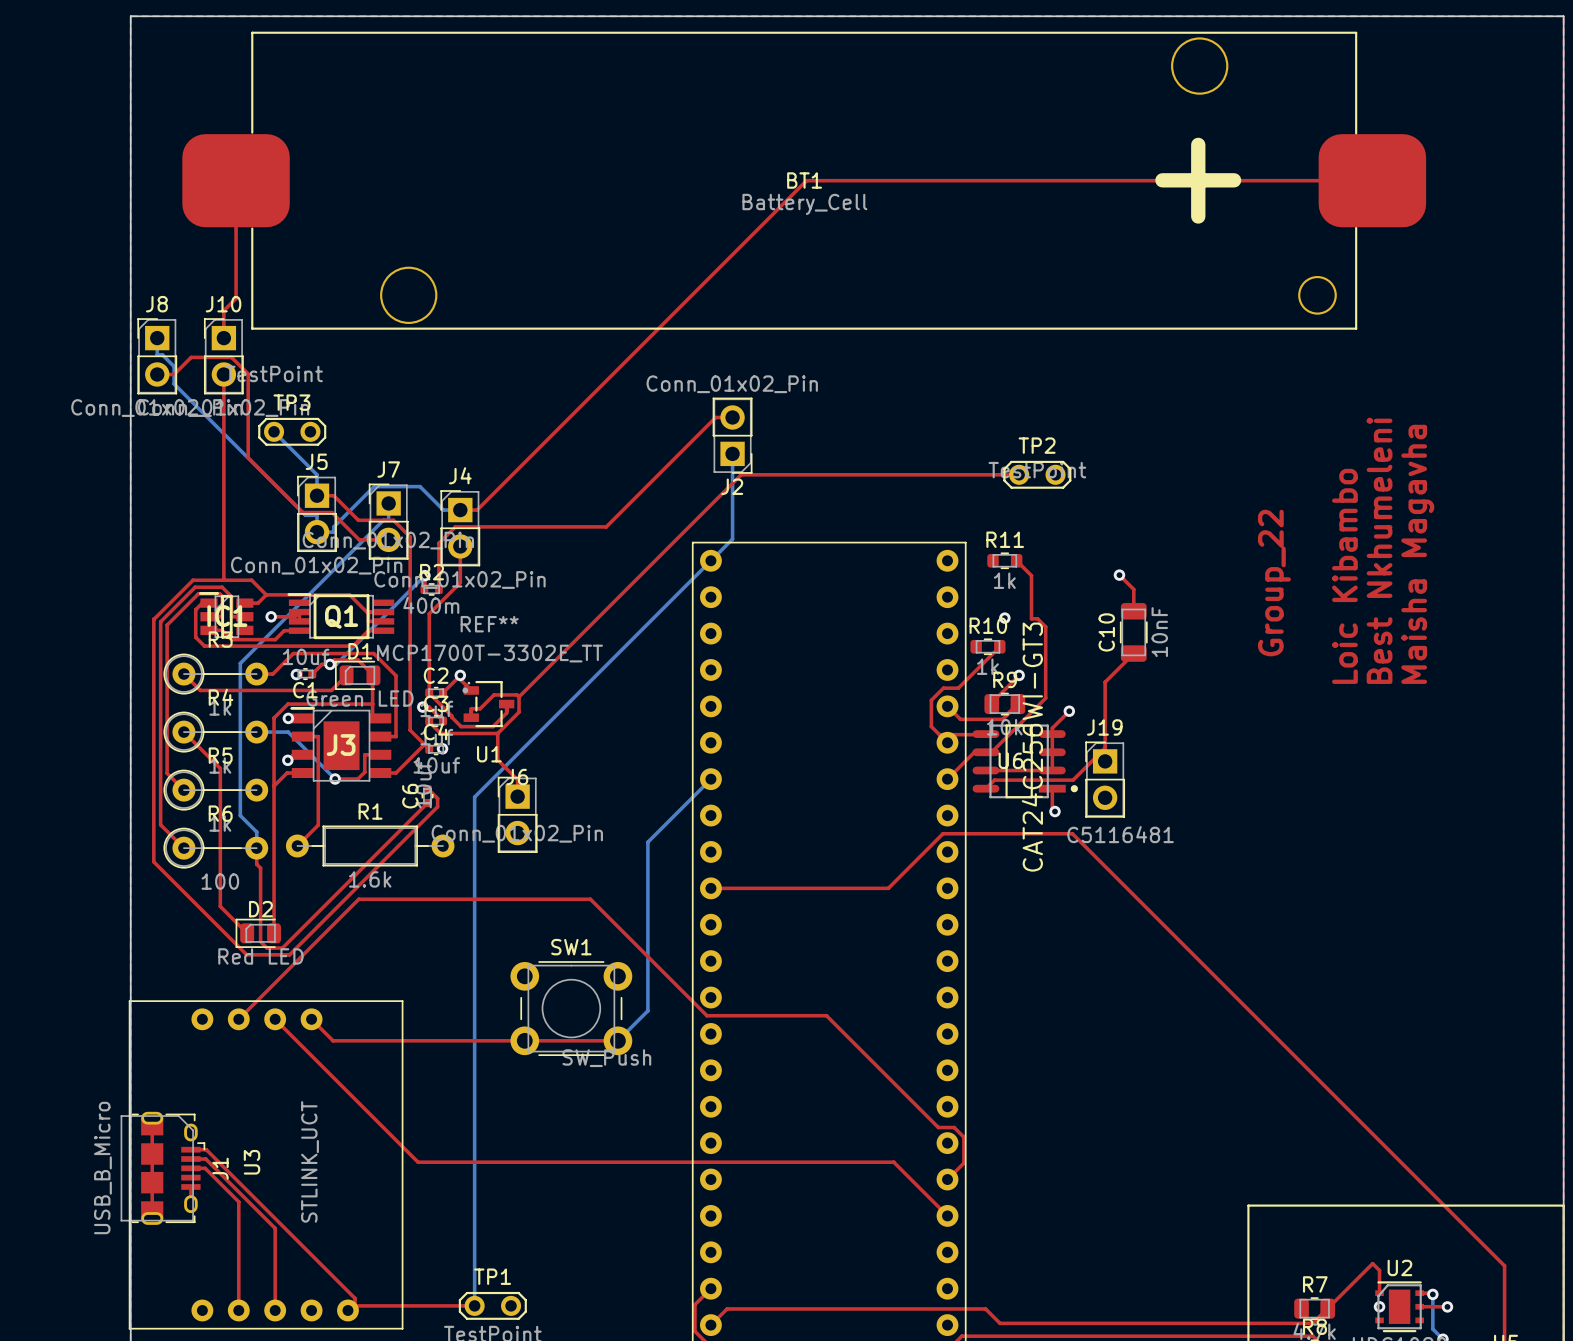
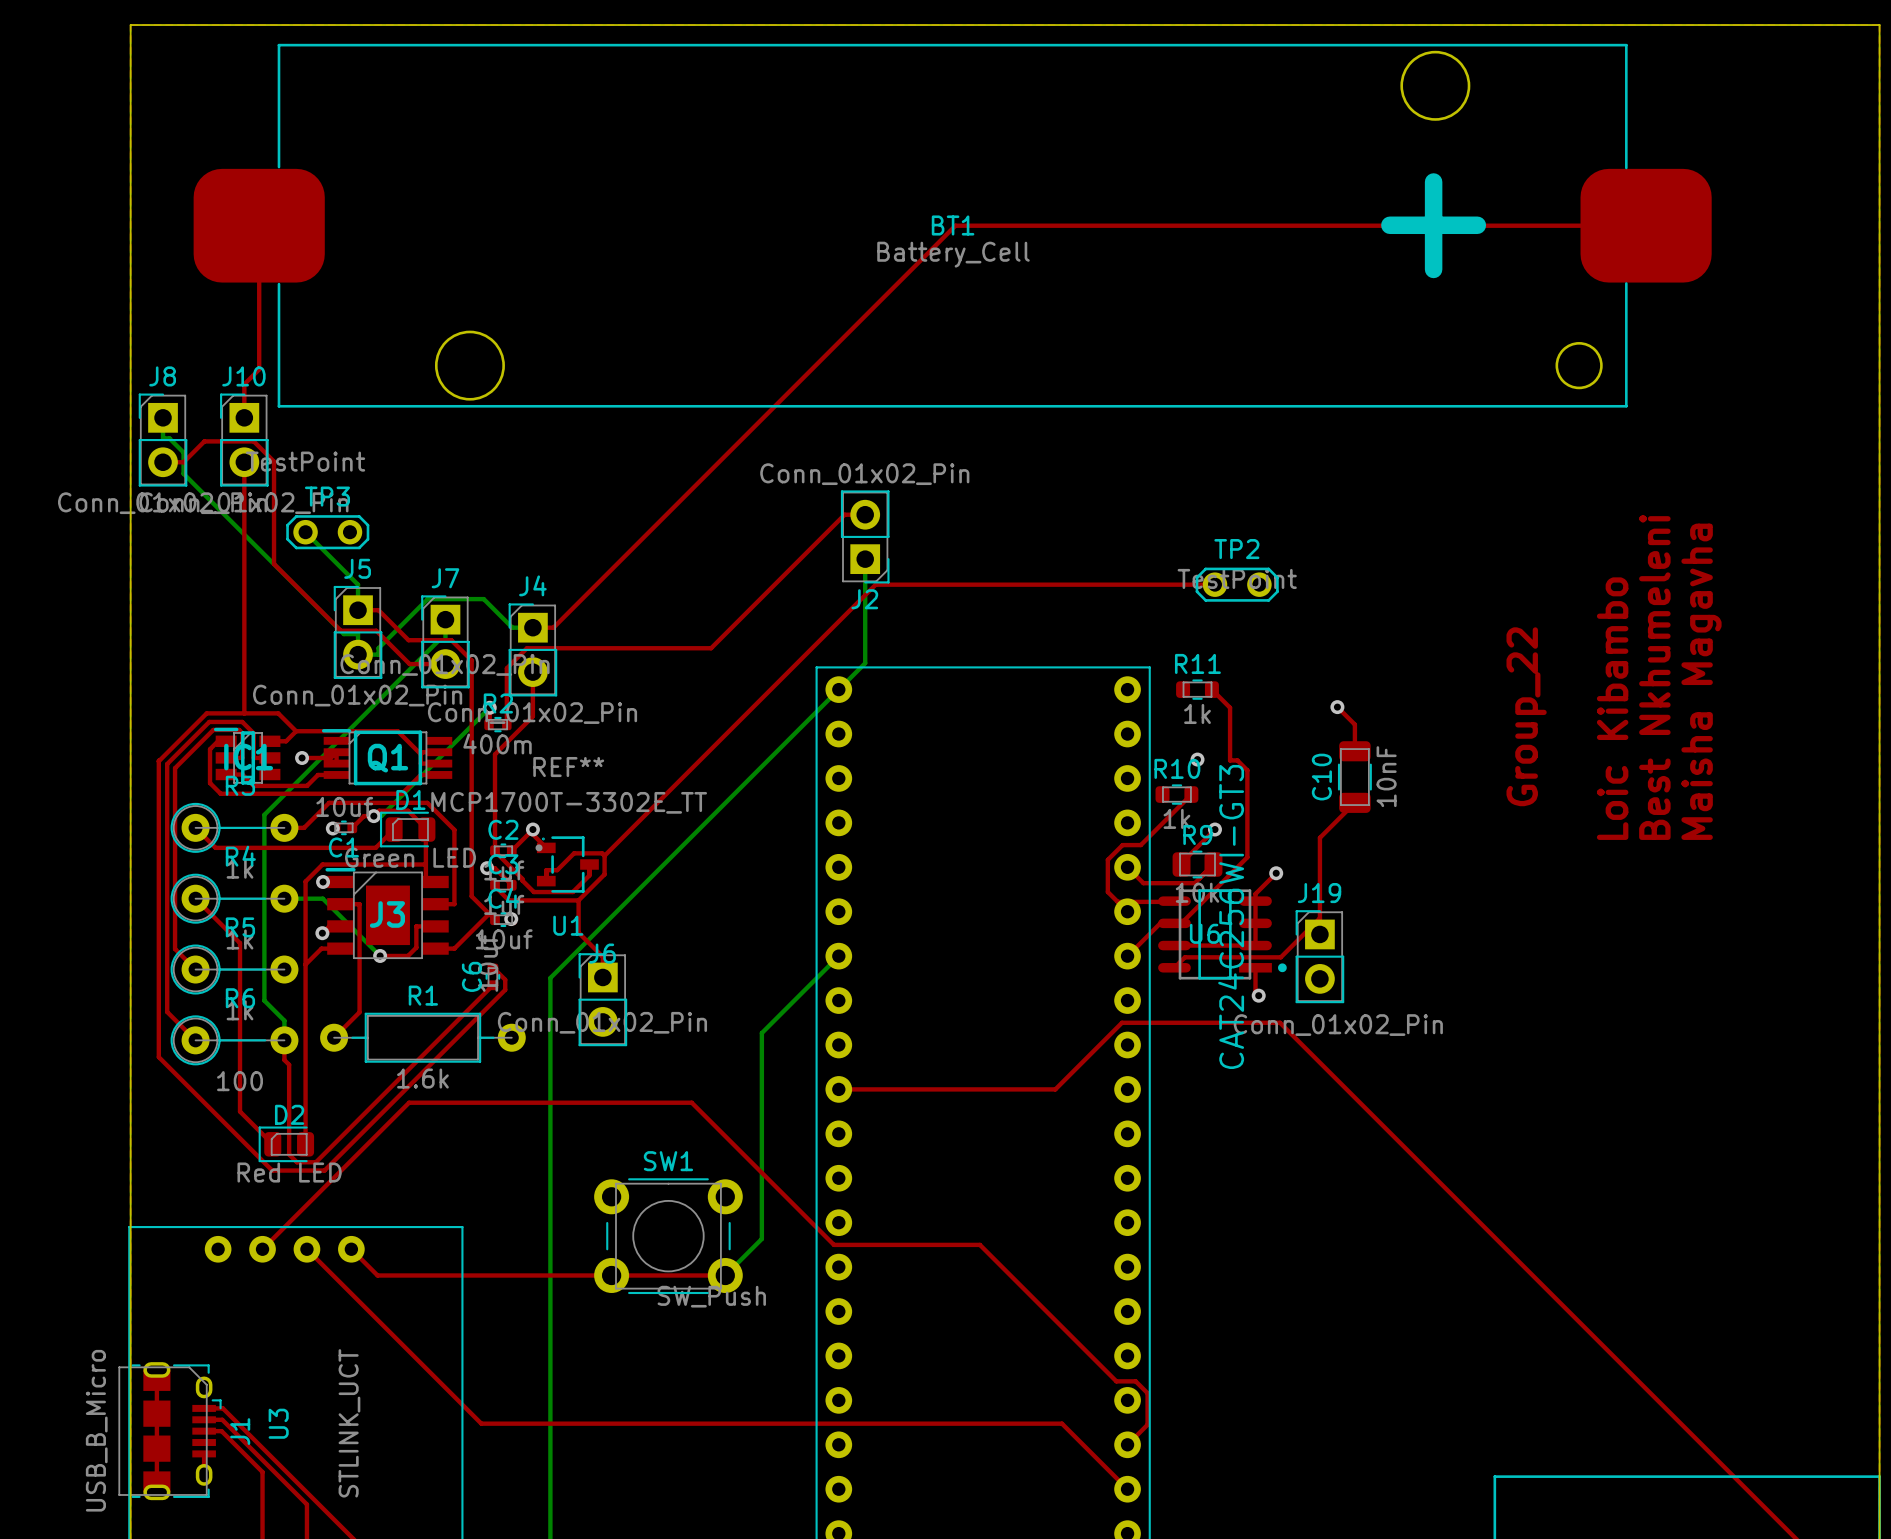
J19 value: C5116481 (1120, 834) -> Conn_01x02_Pin (1338, 1025)

